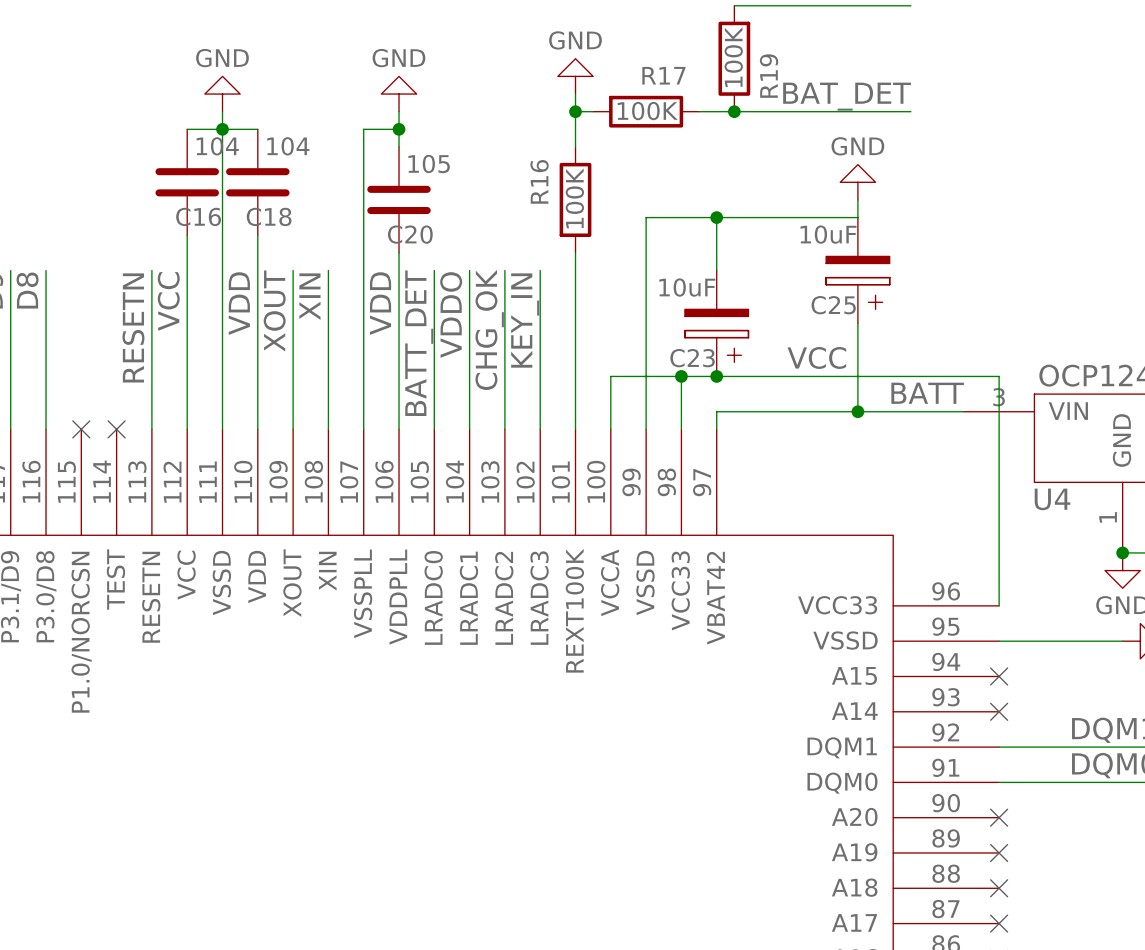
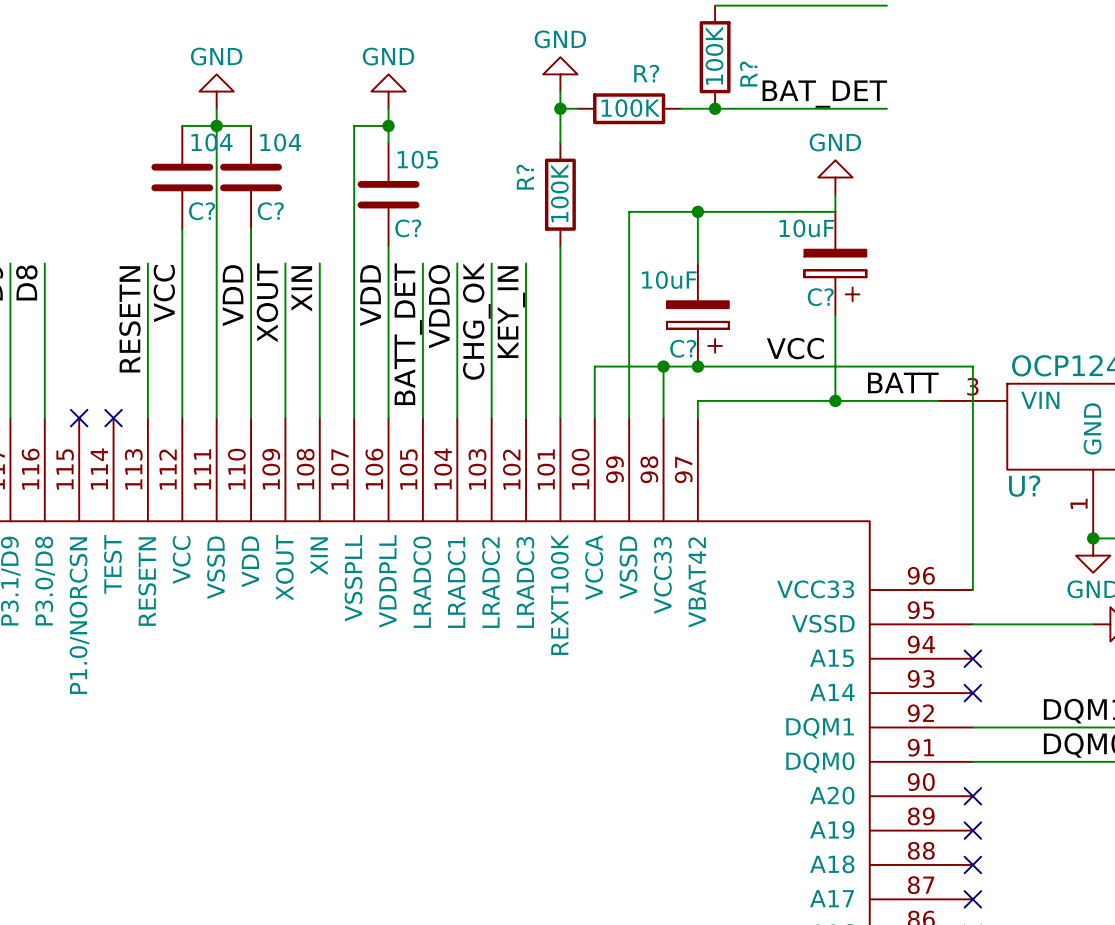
R17 name: R17 (663, 75) -> R? (646, 73)
R19 name: R19 (769, 76) -> R? (748, 74)
R16 name: R16 (539, 181) -> R? (525, 177)
C16 name: C16 (198, 216) -> C? (202, 211)
C18 name: C18 (269, 216) -> C? (270, 211)
C20 name: C20 (410, 234) -> C? (408, 228)
C25 name: C25 (833, 305) -> C? (820, 297)
C23 name: C23 (692, 358) -> C? (683, 348)
U4 name: U4 (1052, 499) -> U? (1024, 486)

